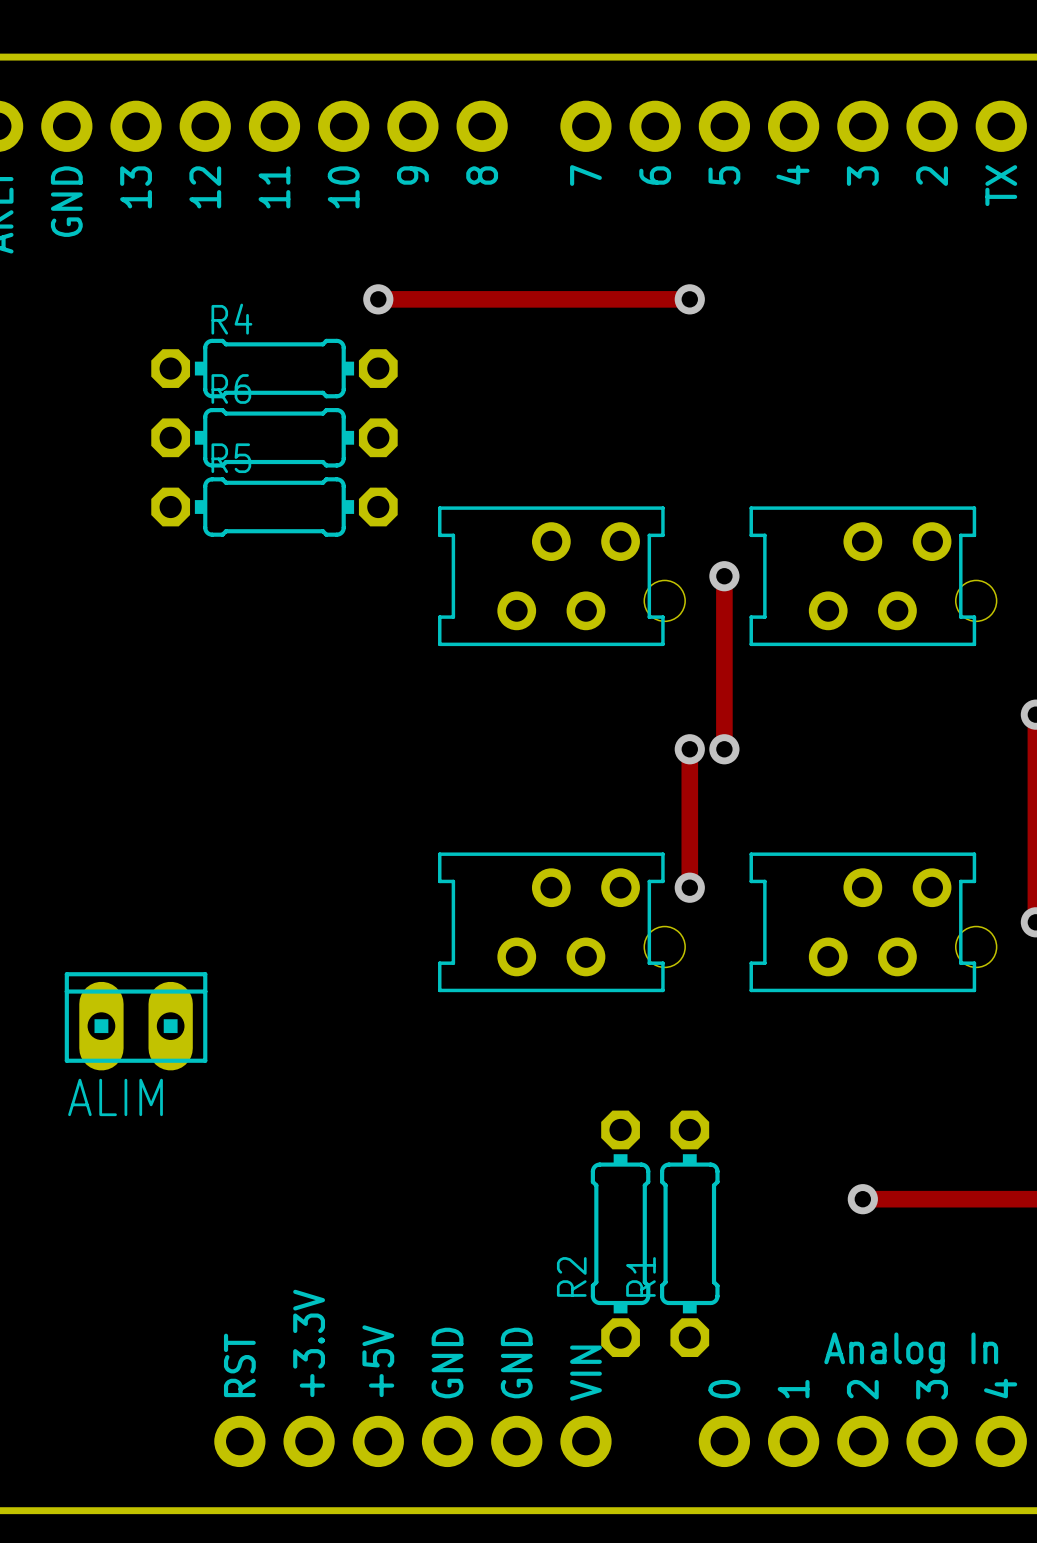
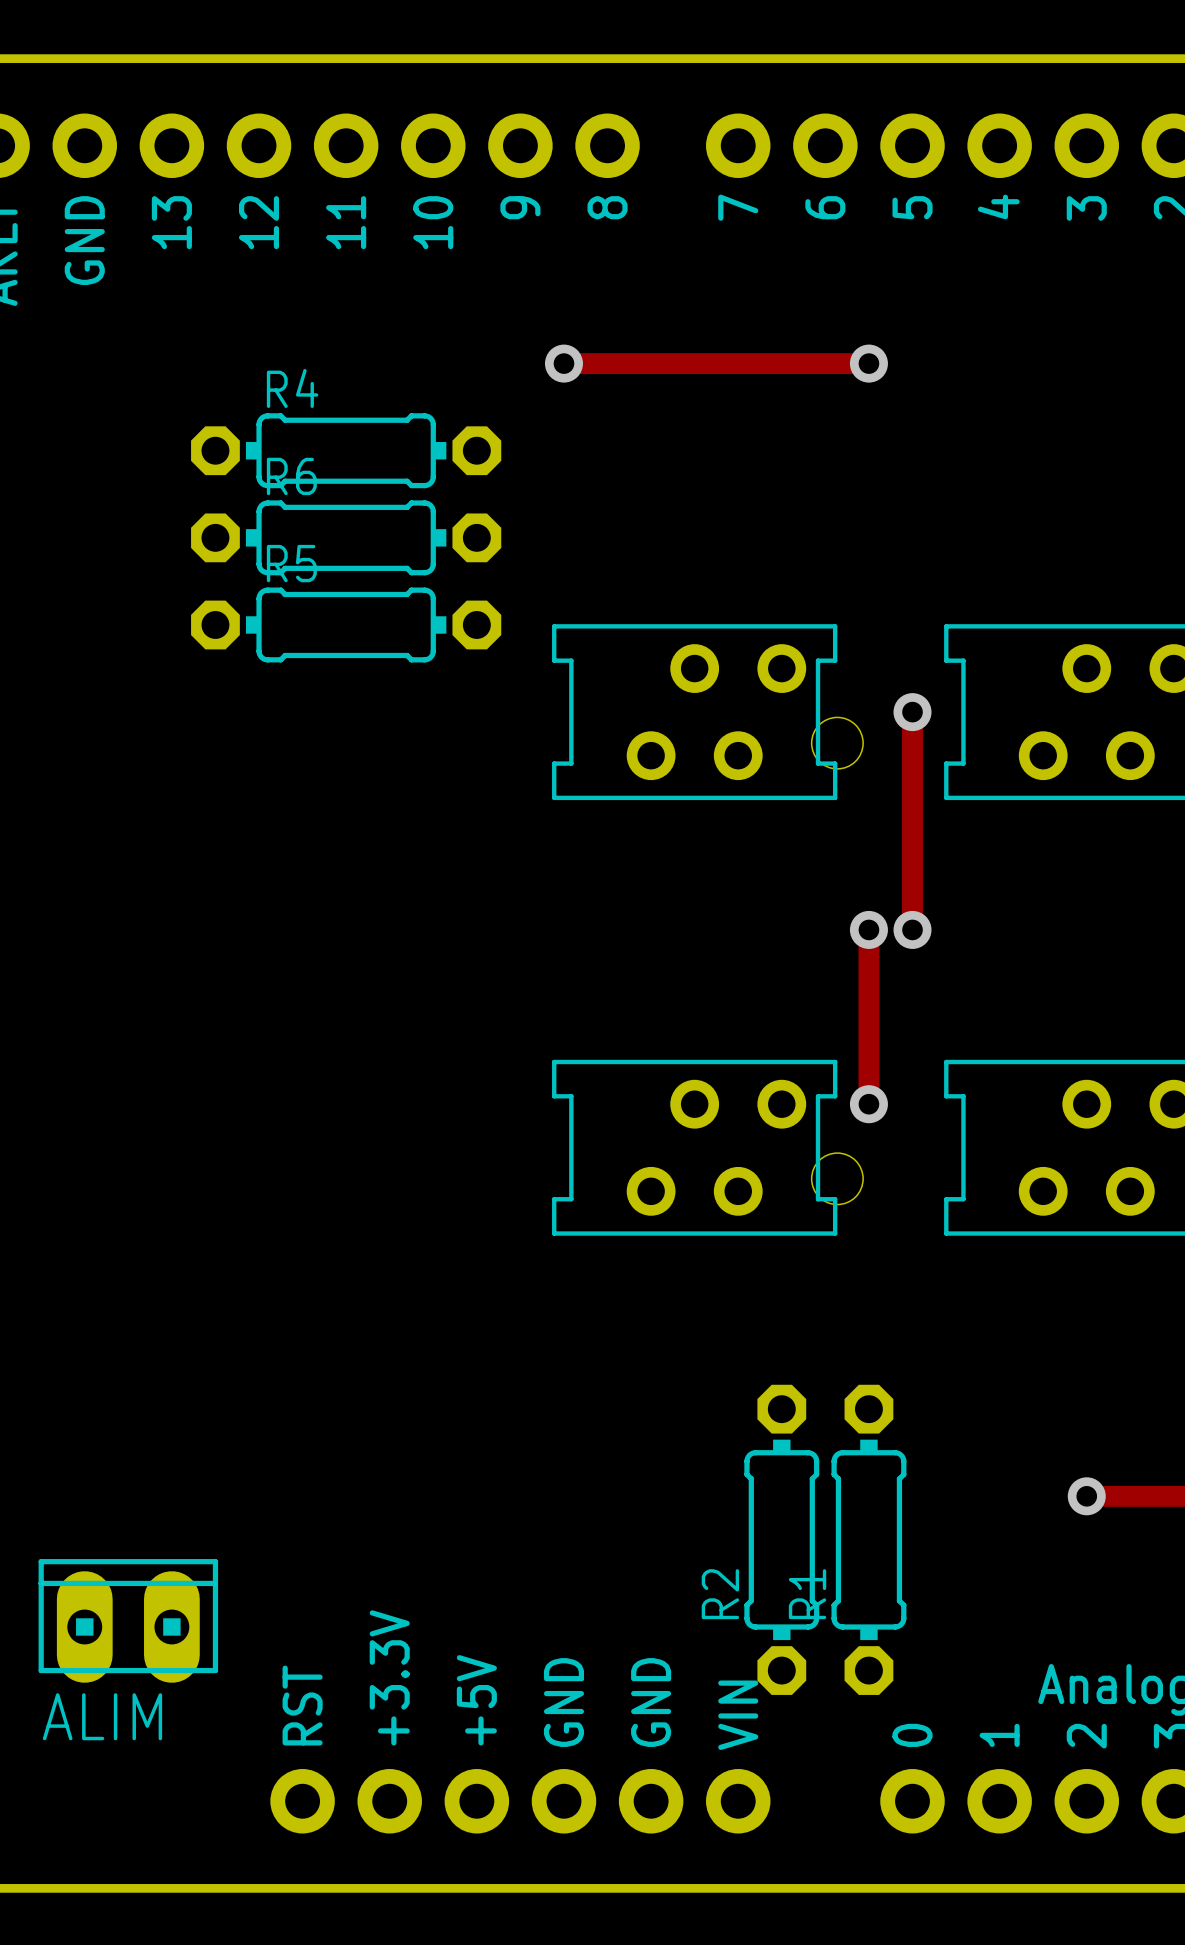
track: (378, 299) (447, 299) -> none
via position: (378, 299) -> (563, 363)
ALIM position: (136, 1021) -> (128, 1620)

